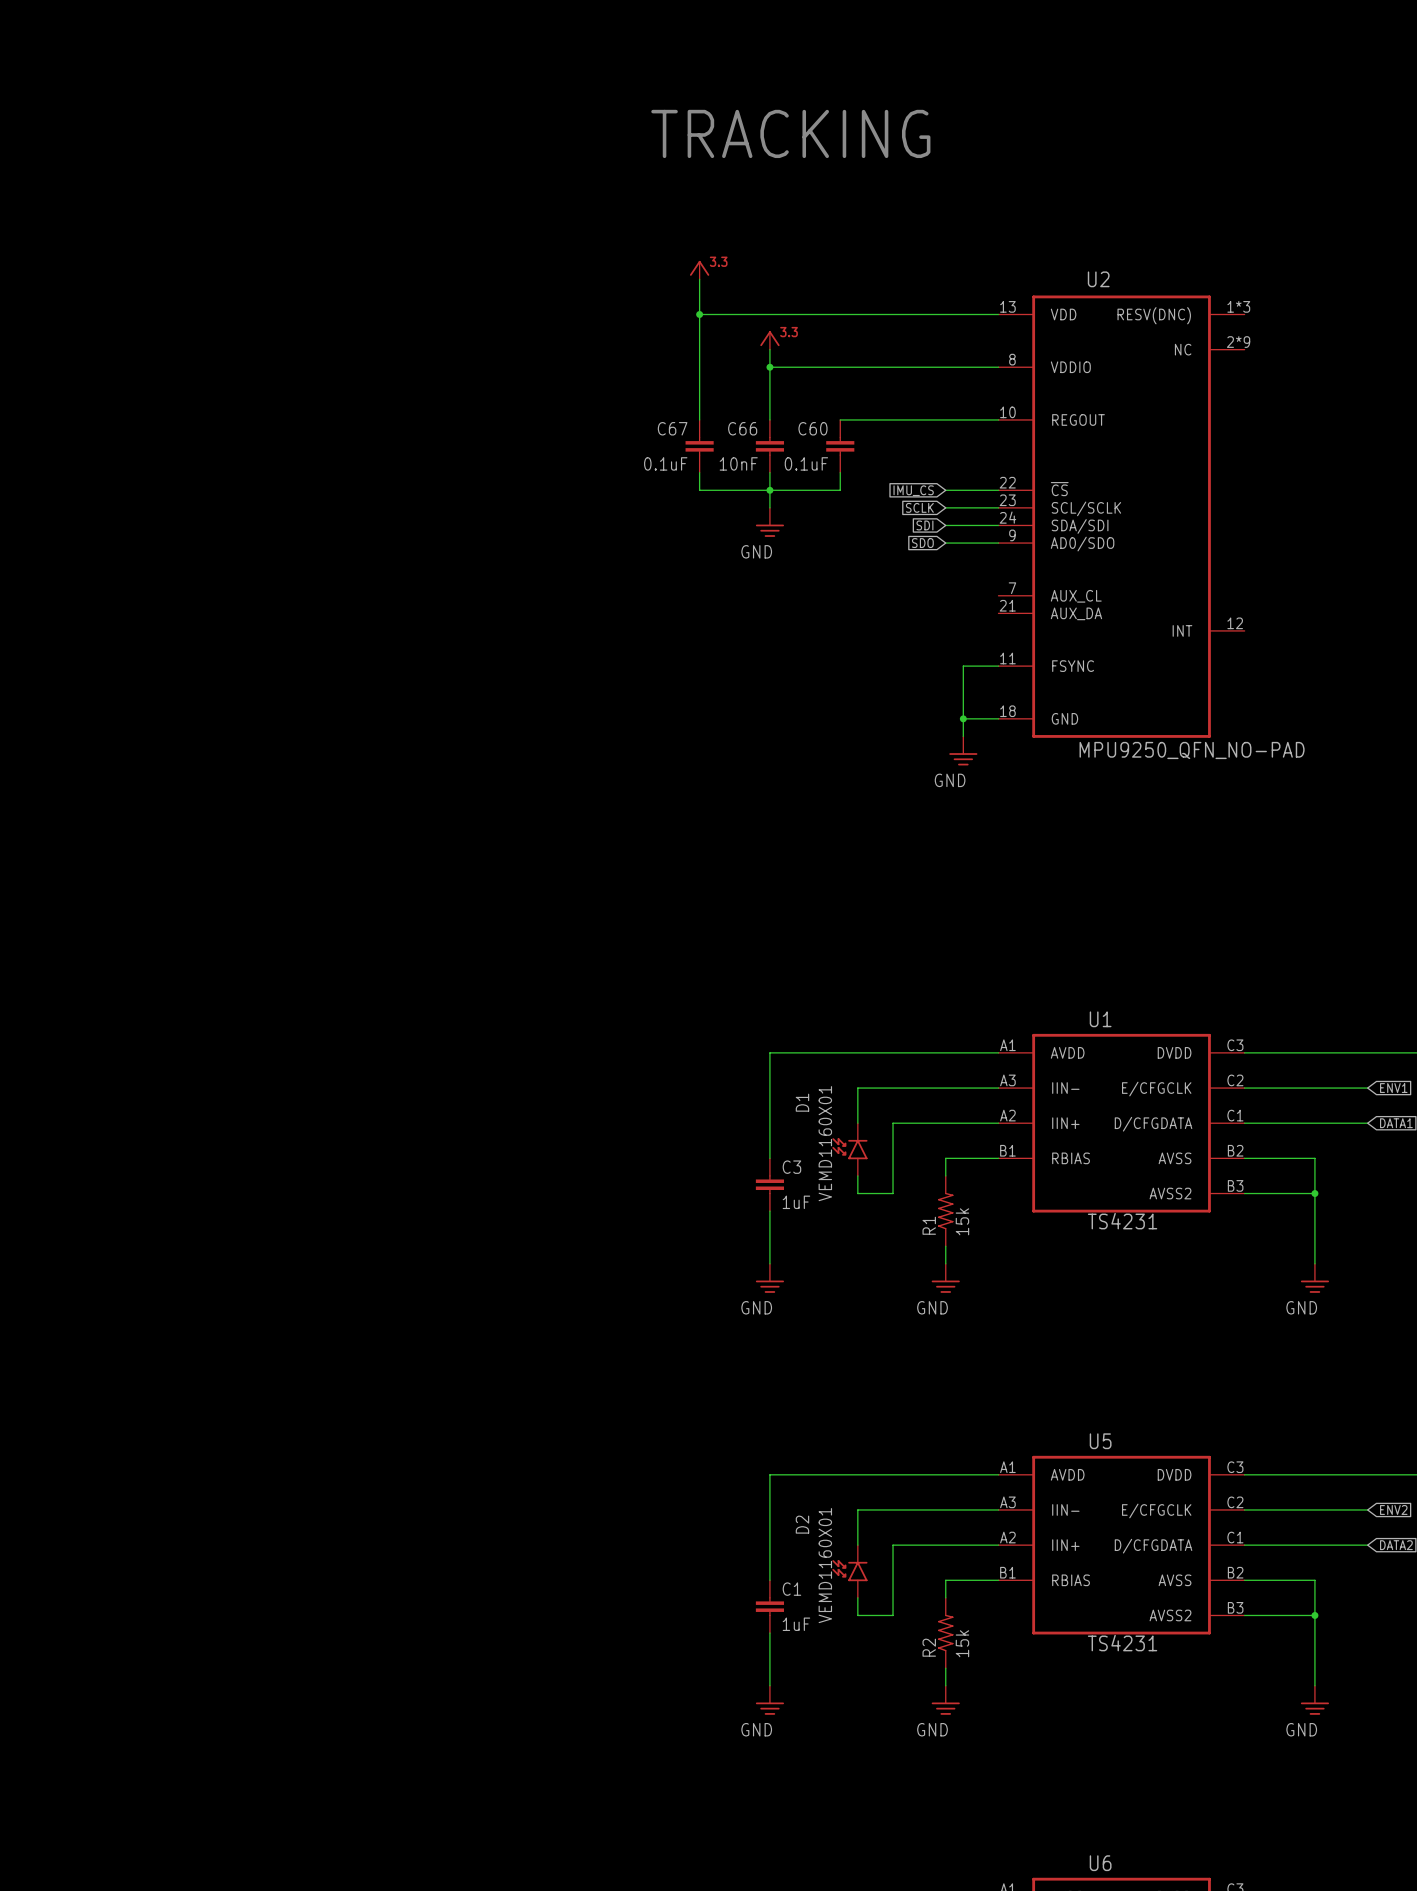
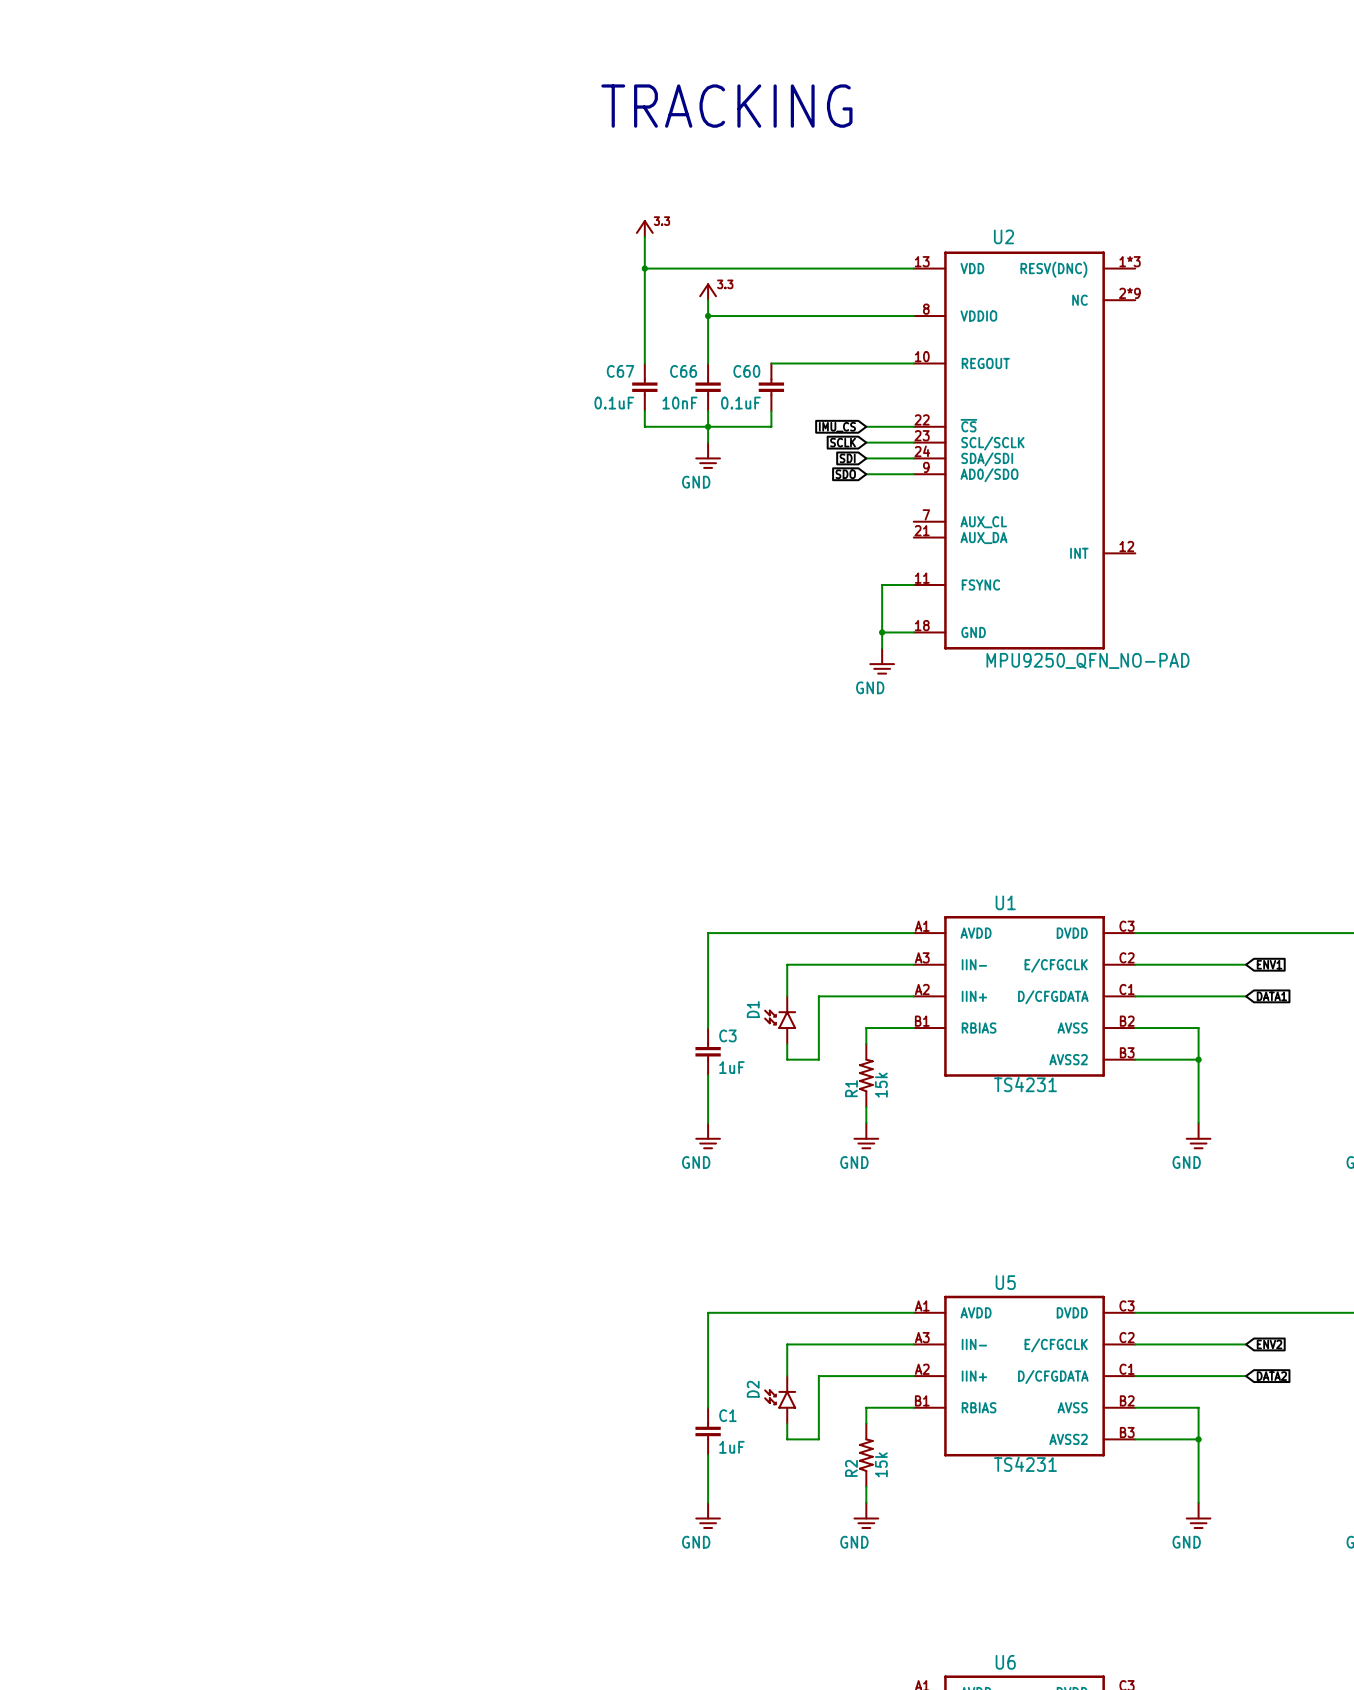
D1 name position: D1 (802, 1102) -> D1 (753, 1009)
D1 value: VEMD1160X01 (825, 1143) -> none
D2 name position: D2 (802, 1524) -> D2 (753, 1389)
D2 value: VEMD1160X01 (825, 1565) -> none

